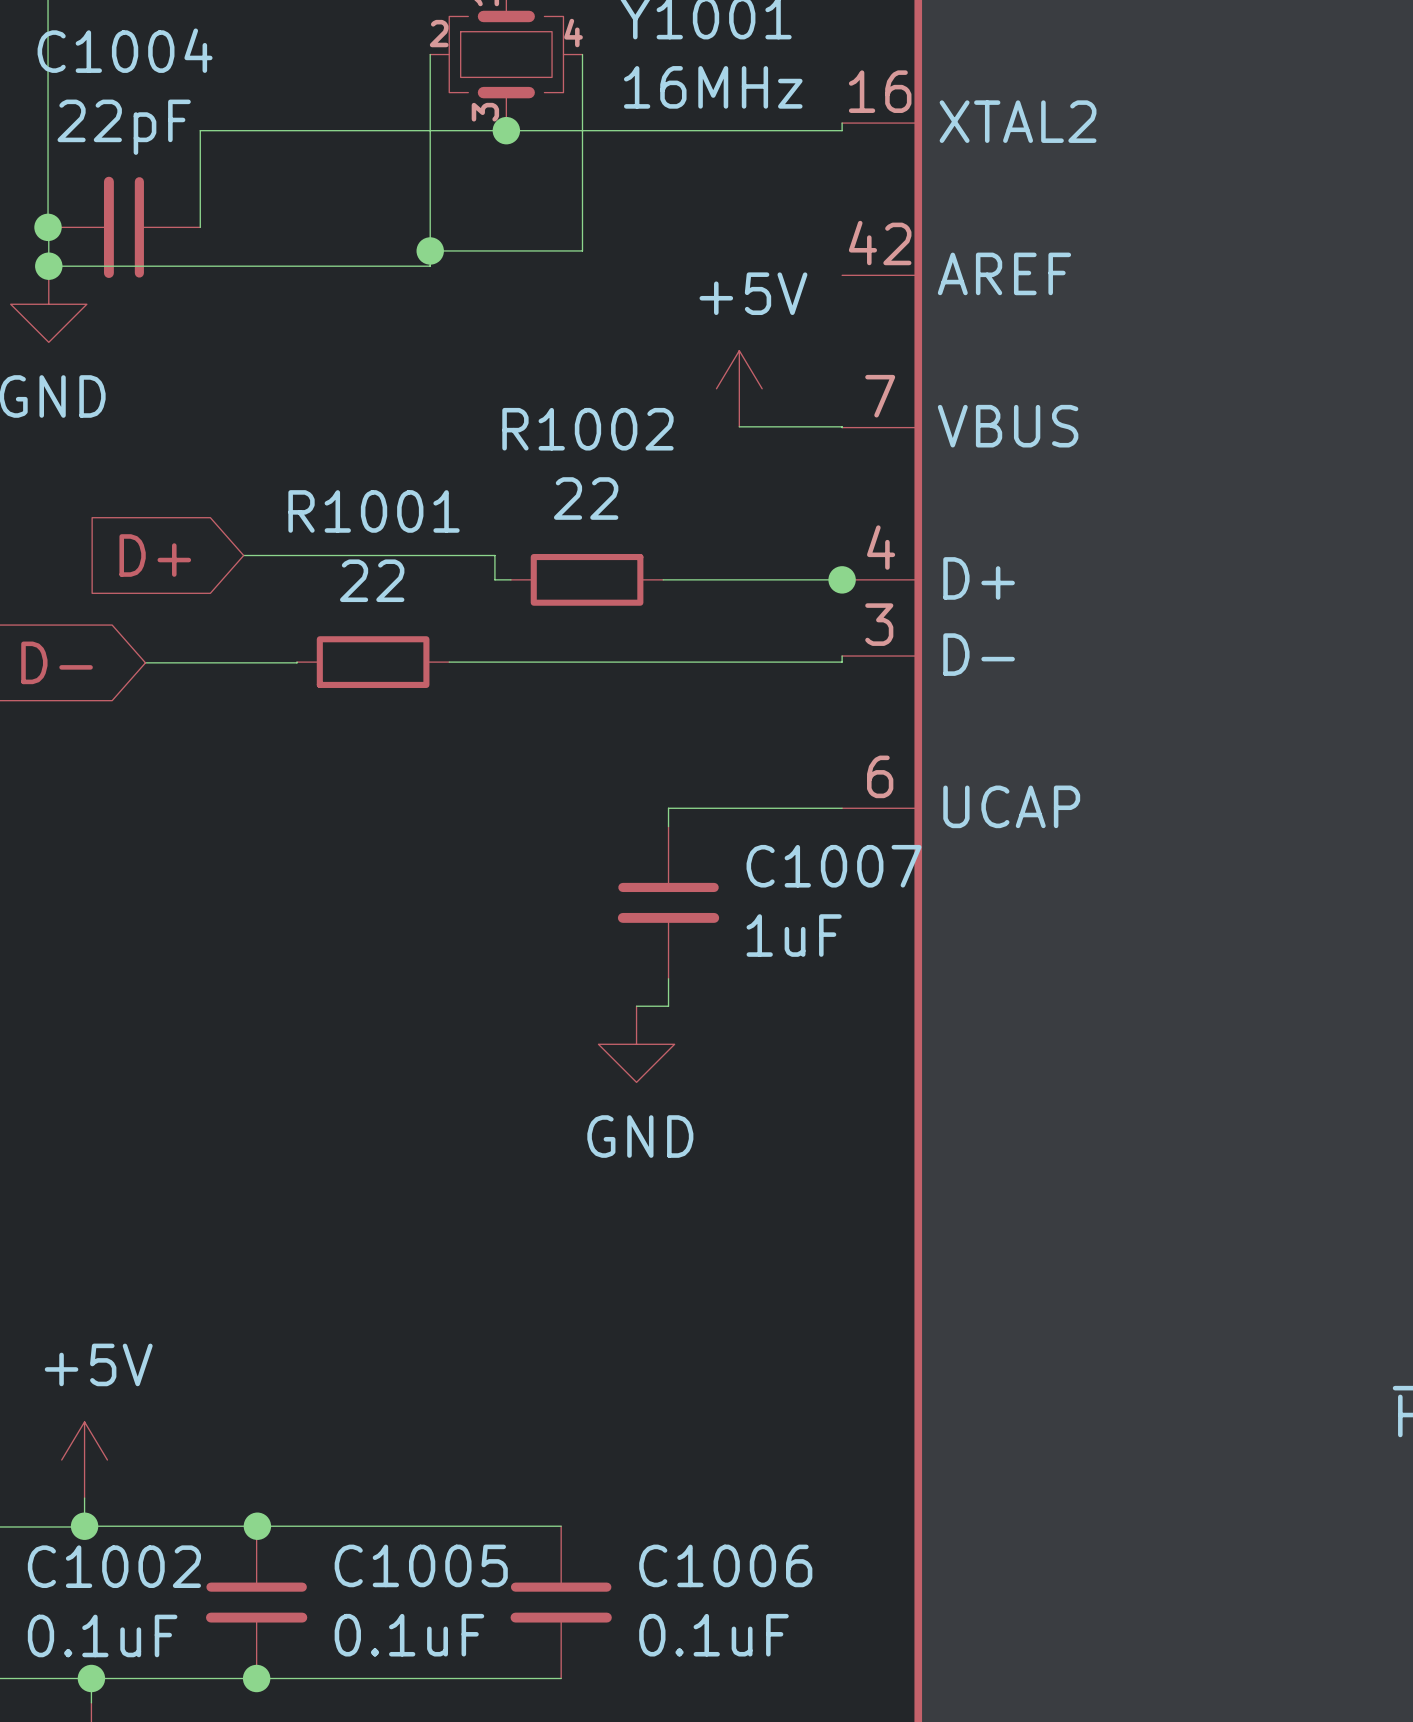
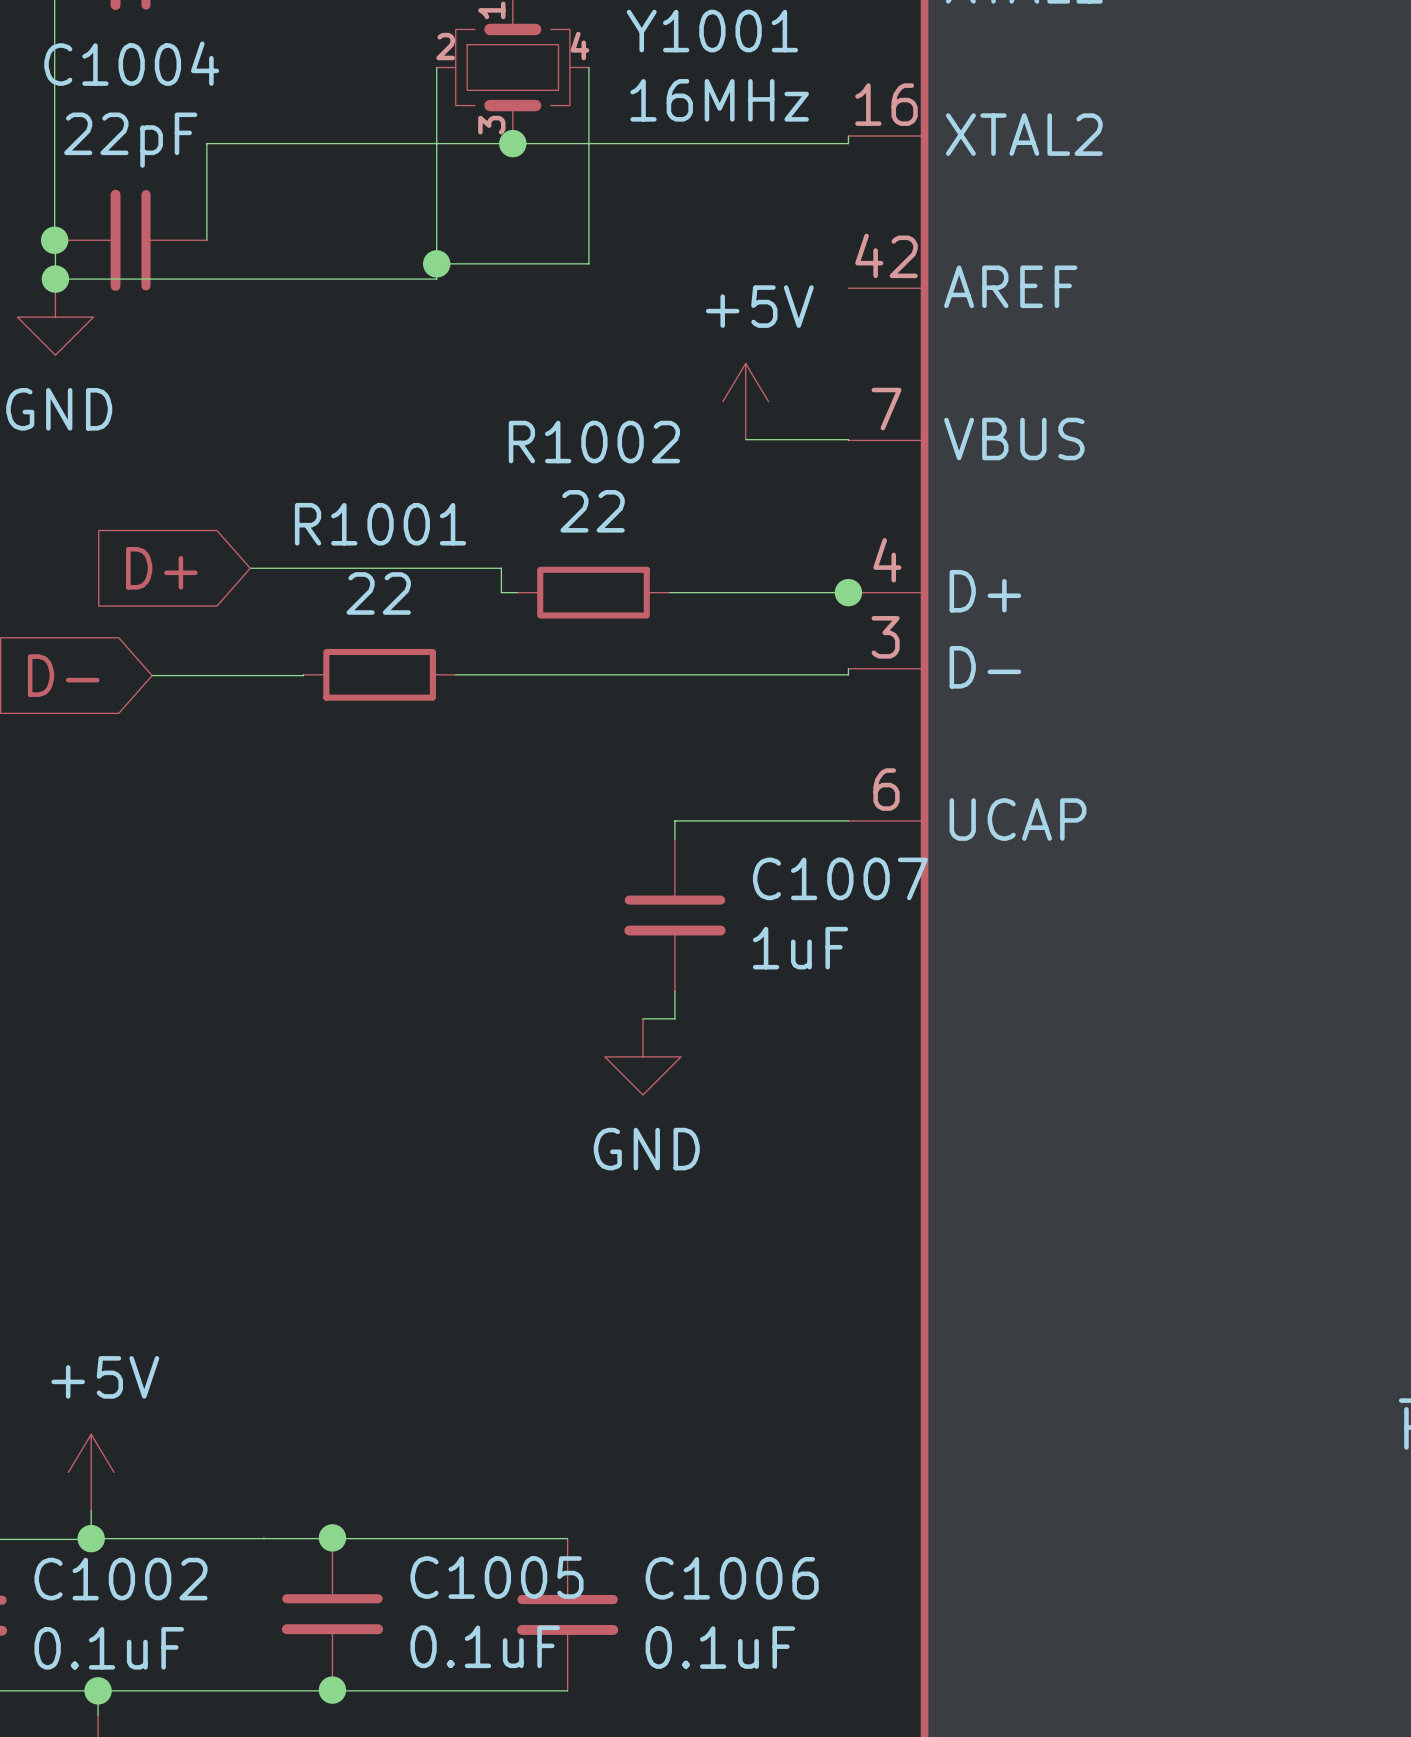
junction position: (257, 1526) -> (332, 1537)
C1005 position: (256, 1602) -> (332, 1613)
junction position: (256, 1678) -> (332, 1690)

